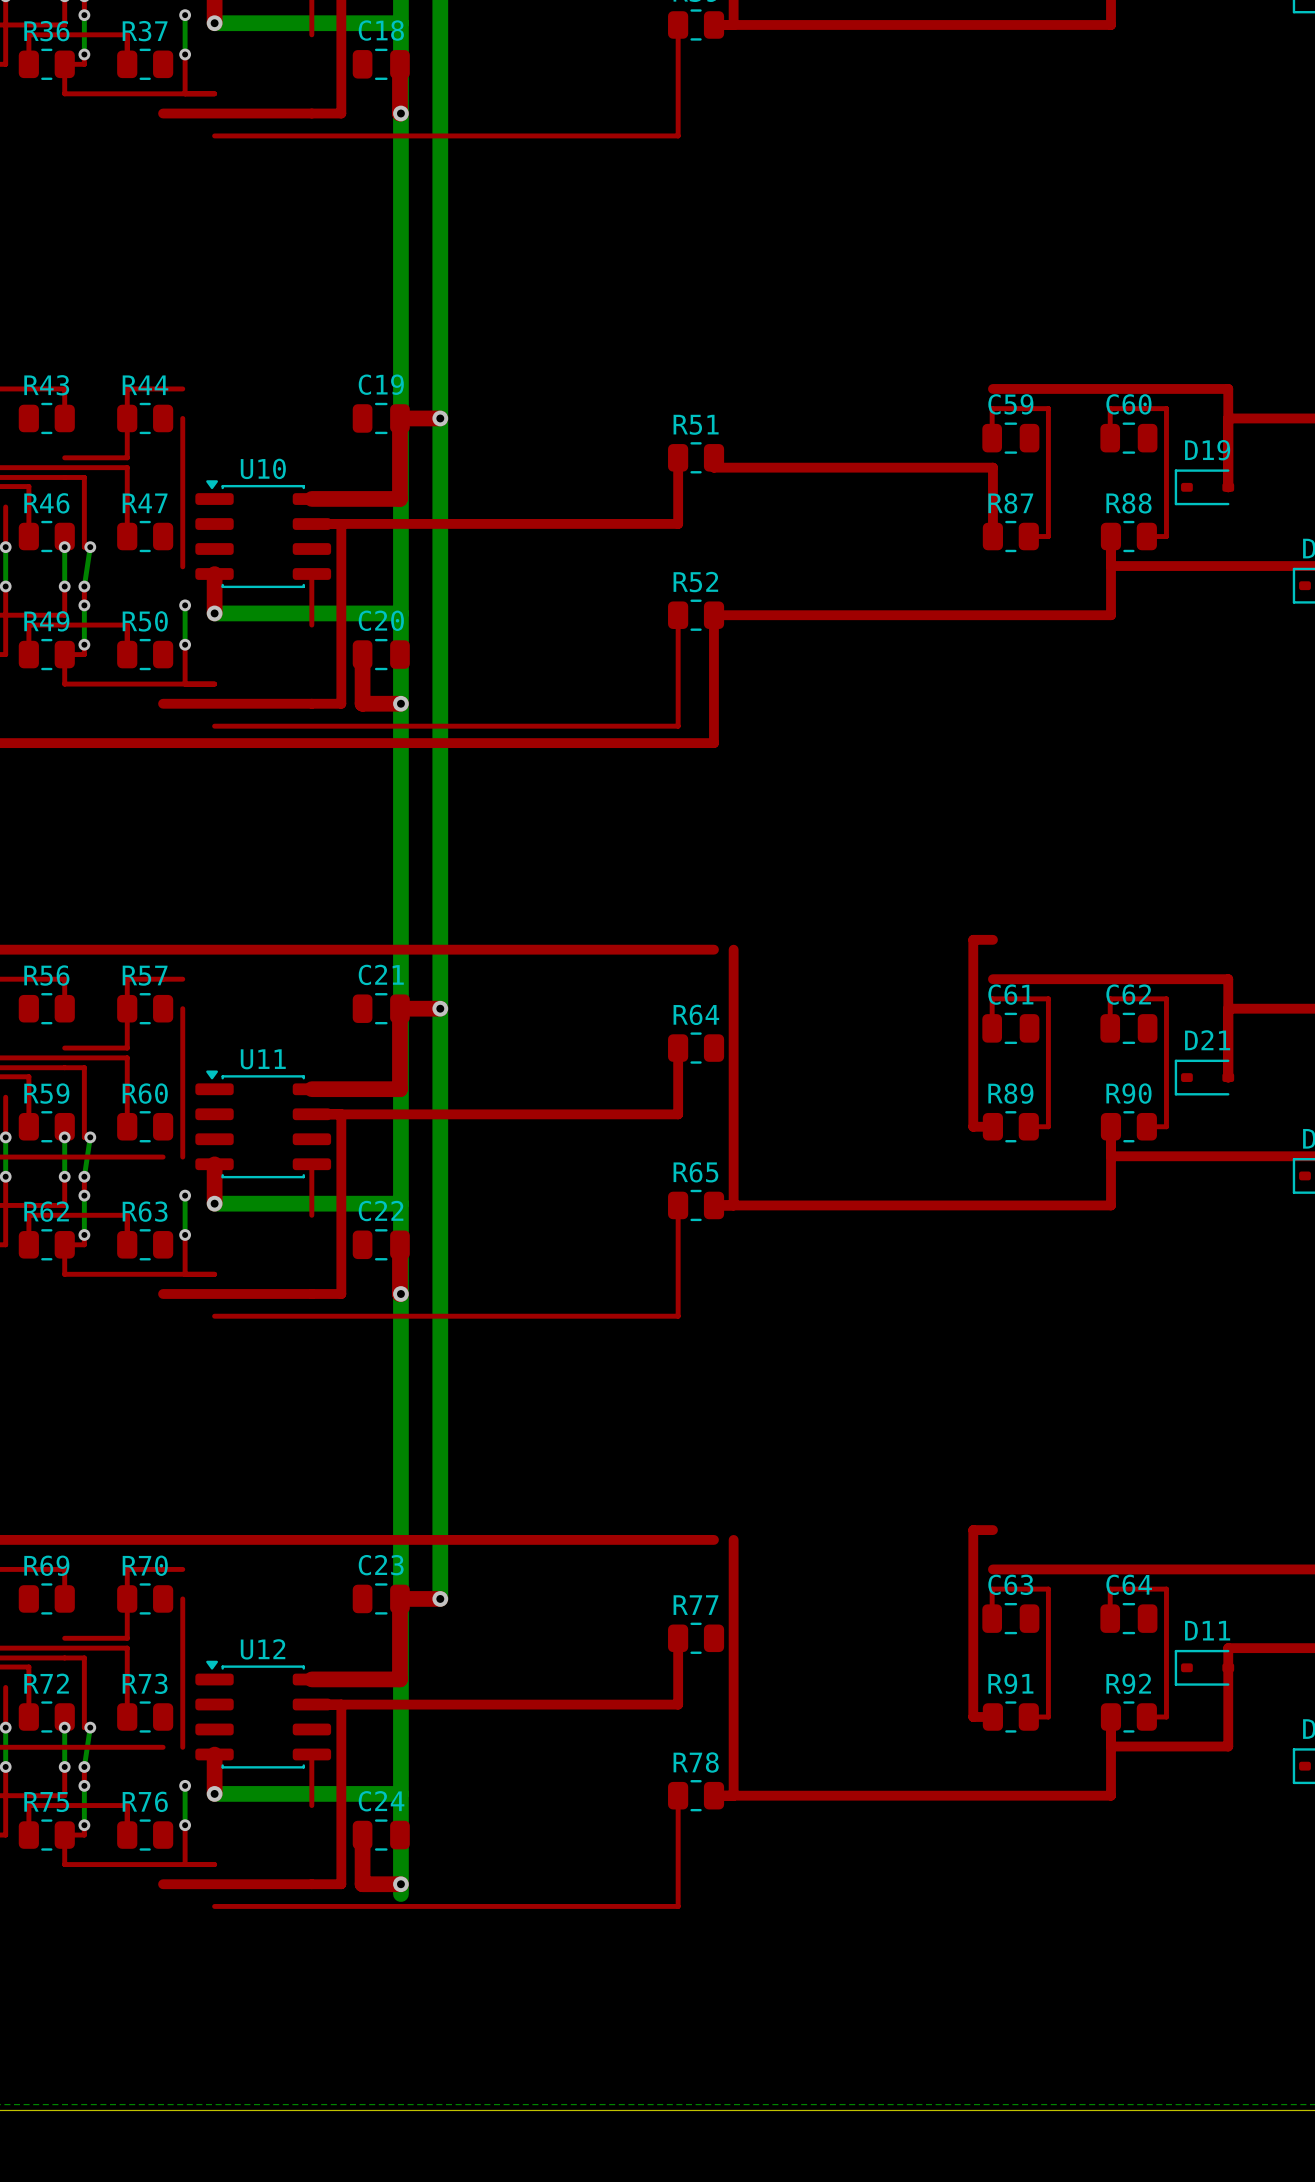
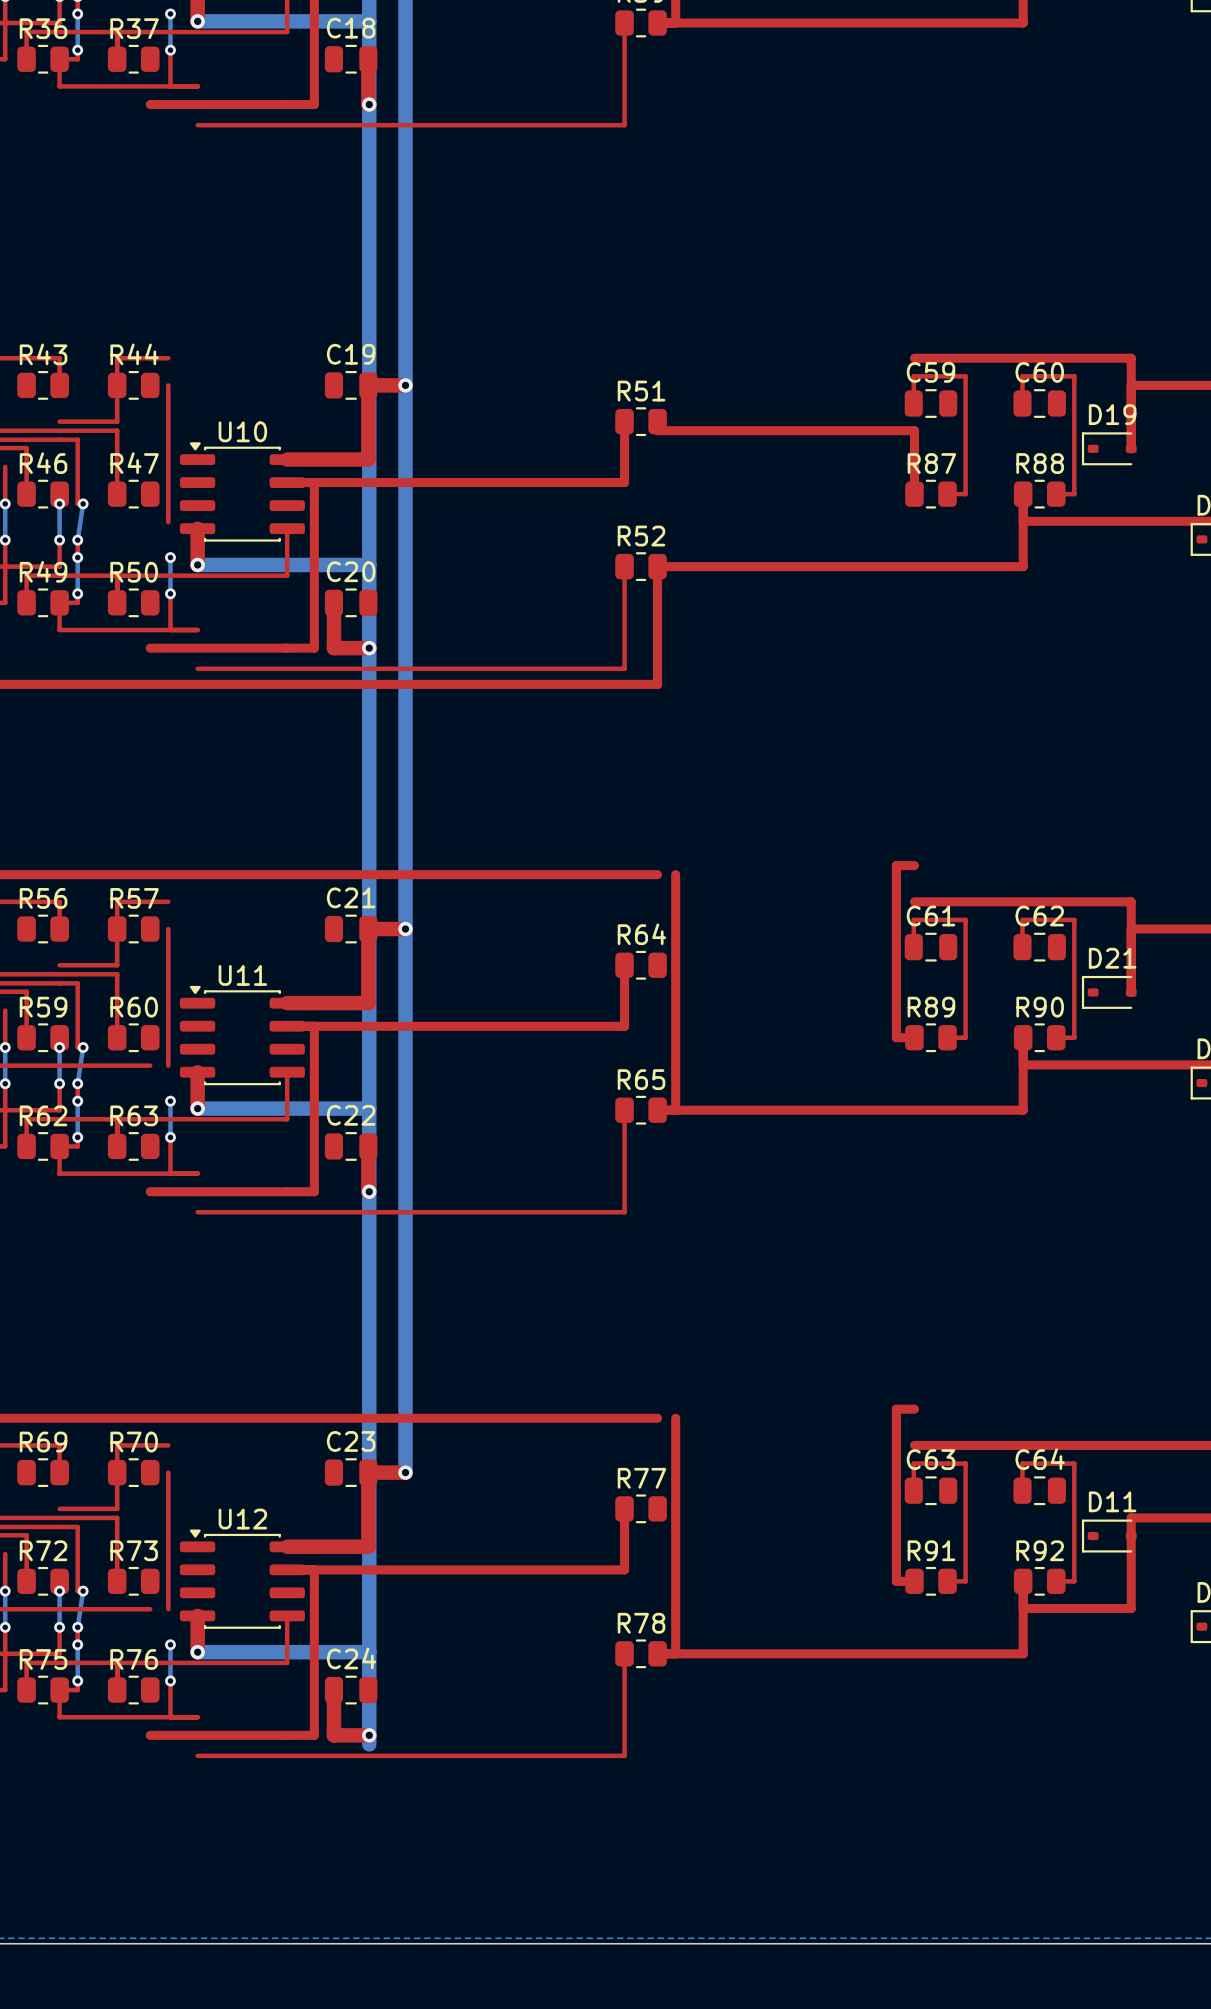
top track: none -> (117, 32) (287, 32)
top track: none -> (117, 575) (287, 575)
top track: none -> (117, 1119) (287, 1119)
top track: none -> (117, 1662) (287, 1662)

